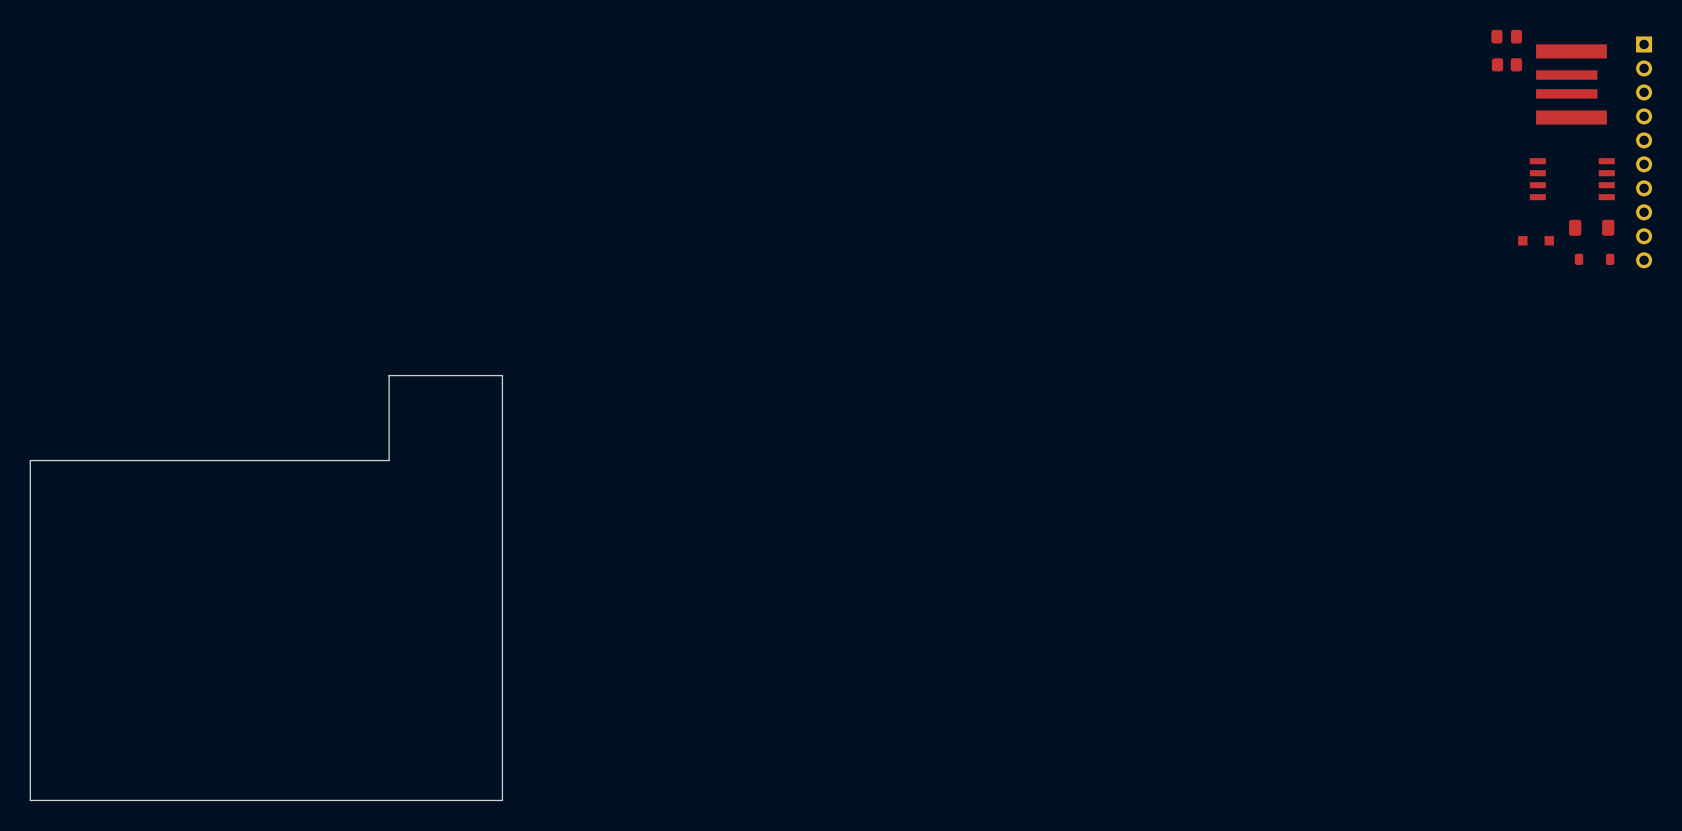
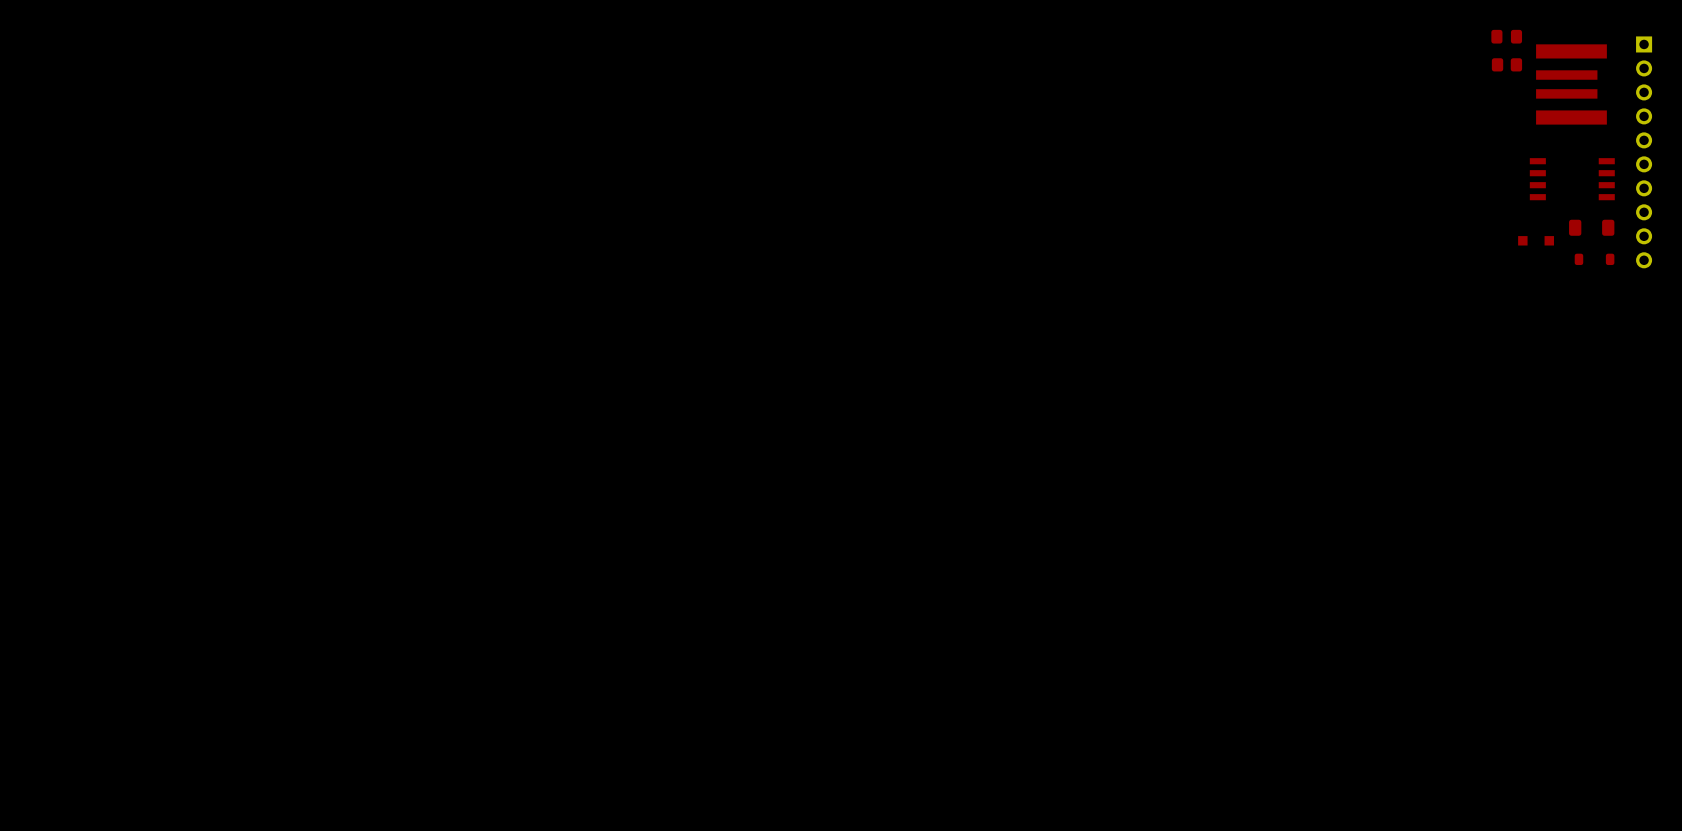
board edge: (502, 375) (502, 800) (30, 800) (30, 460) (389, 460) (389, 375) (502, 375) -> none

